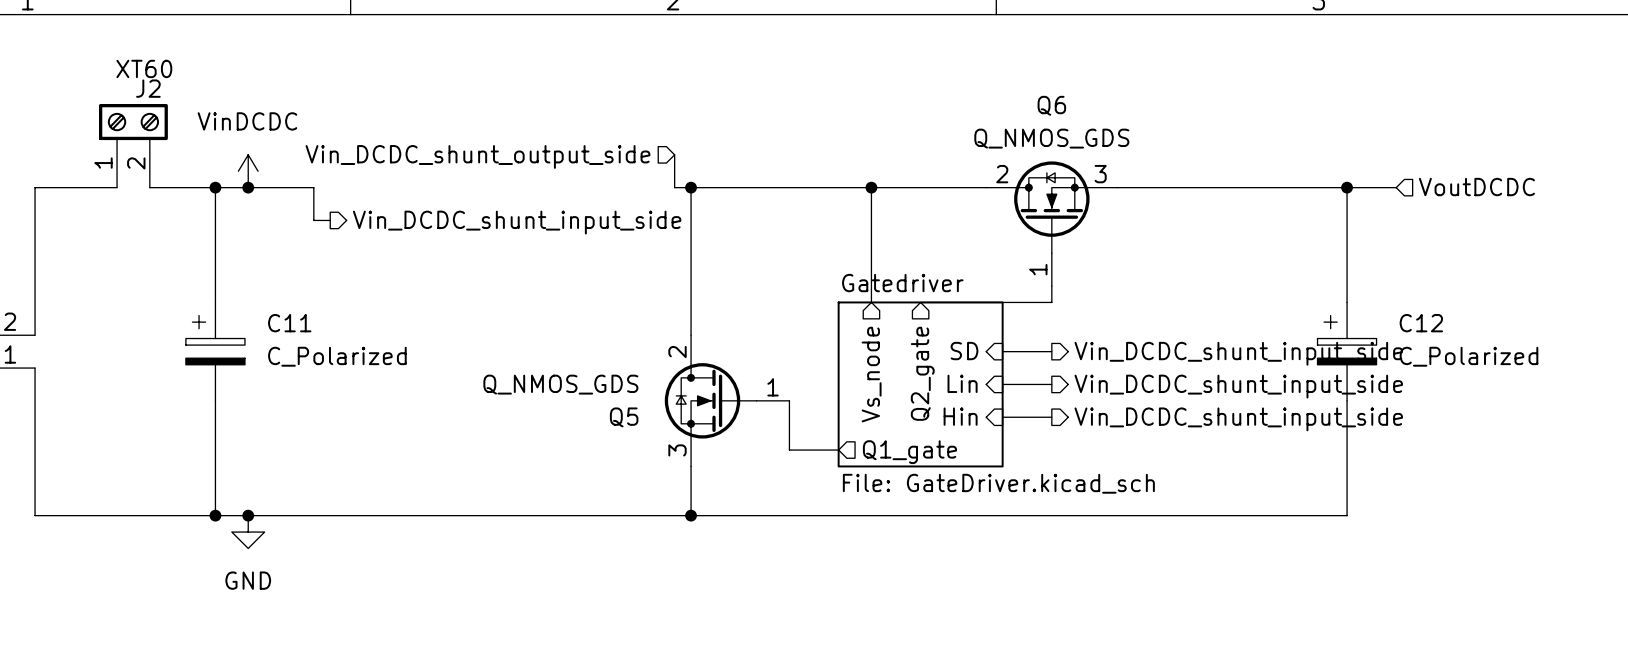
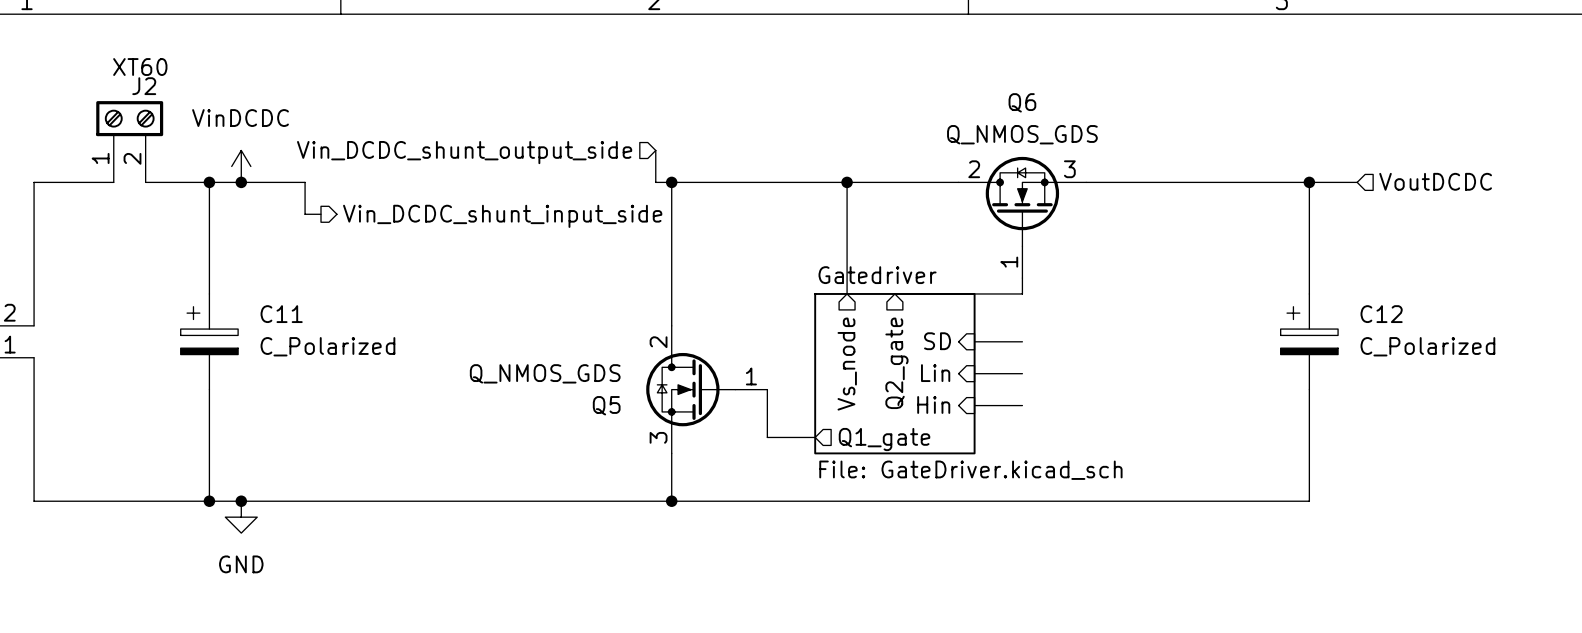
hierarchical label: Vin_DCDC_shunt_input_side (1238, 353) -> none
hierarchical label: Vin_DCDC_shunt_input_side (1238, 386) -> none
hierarchical label: Vin_DCDC_shunt_input_side (1238, 419) -> none

